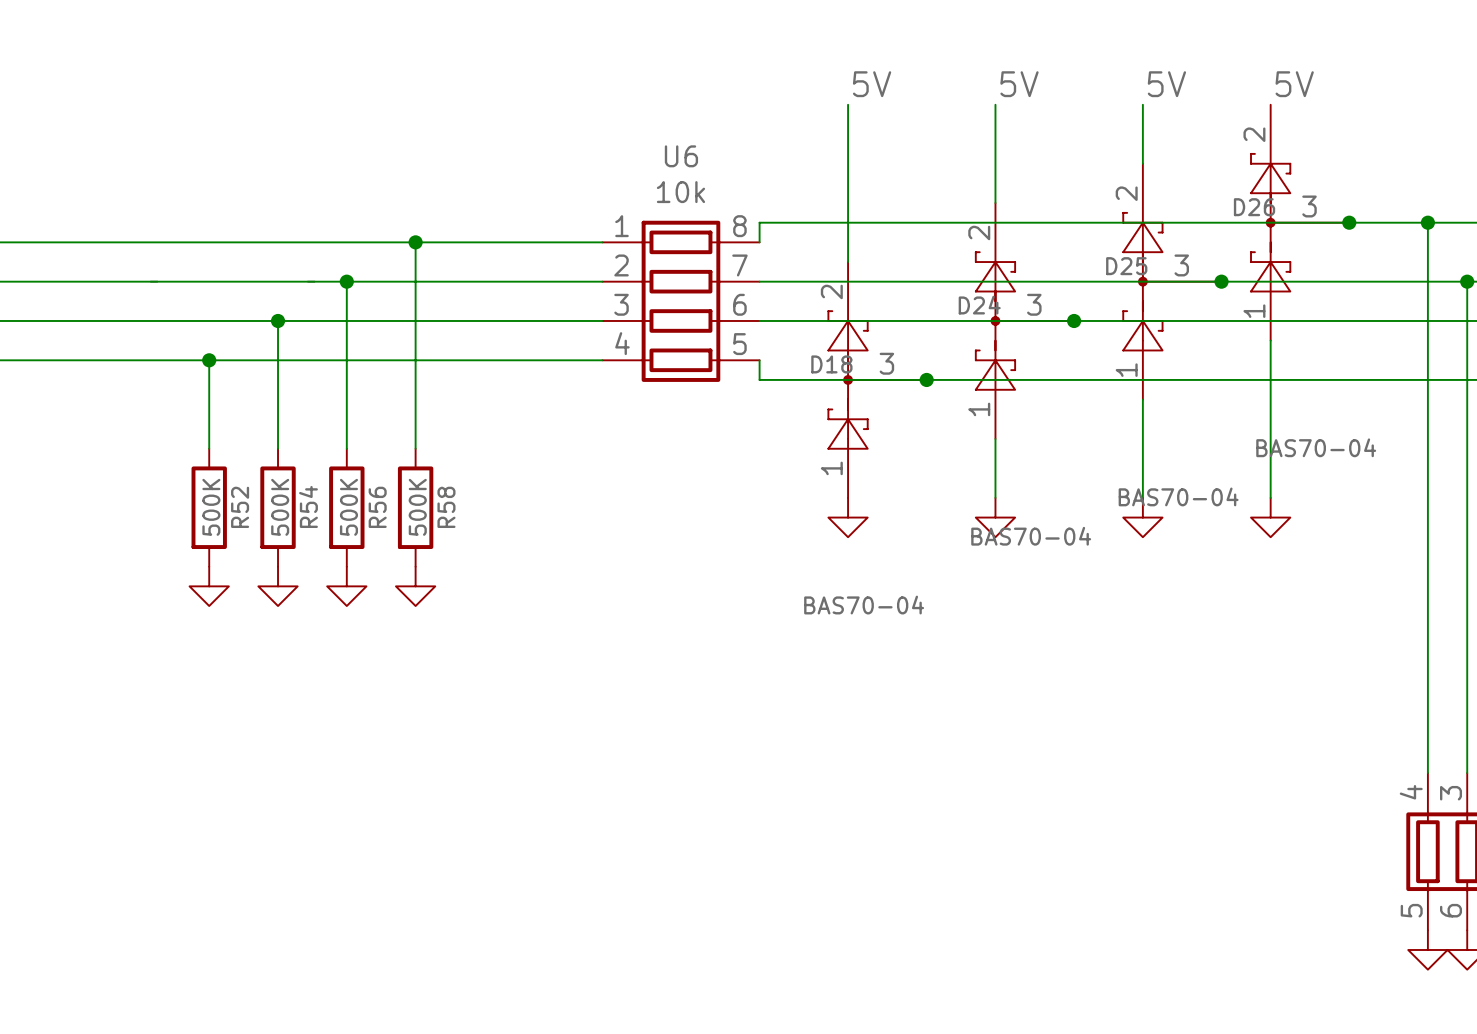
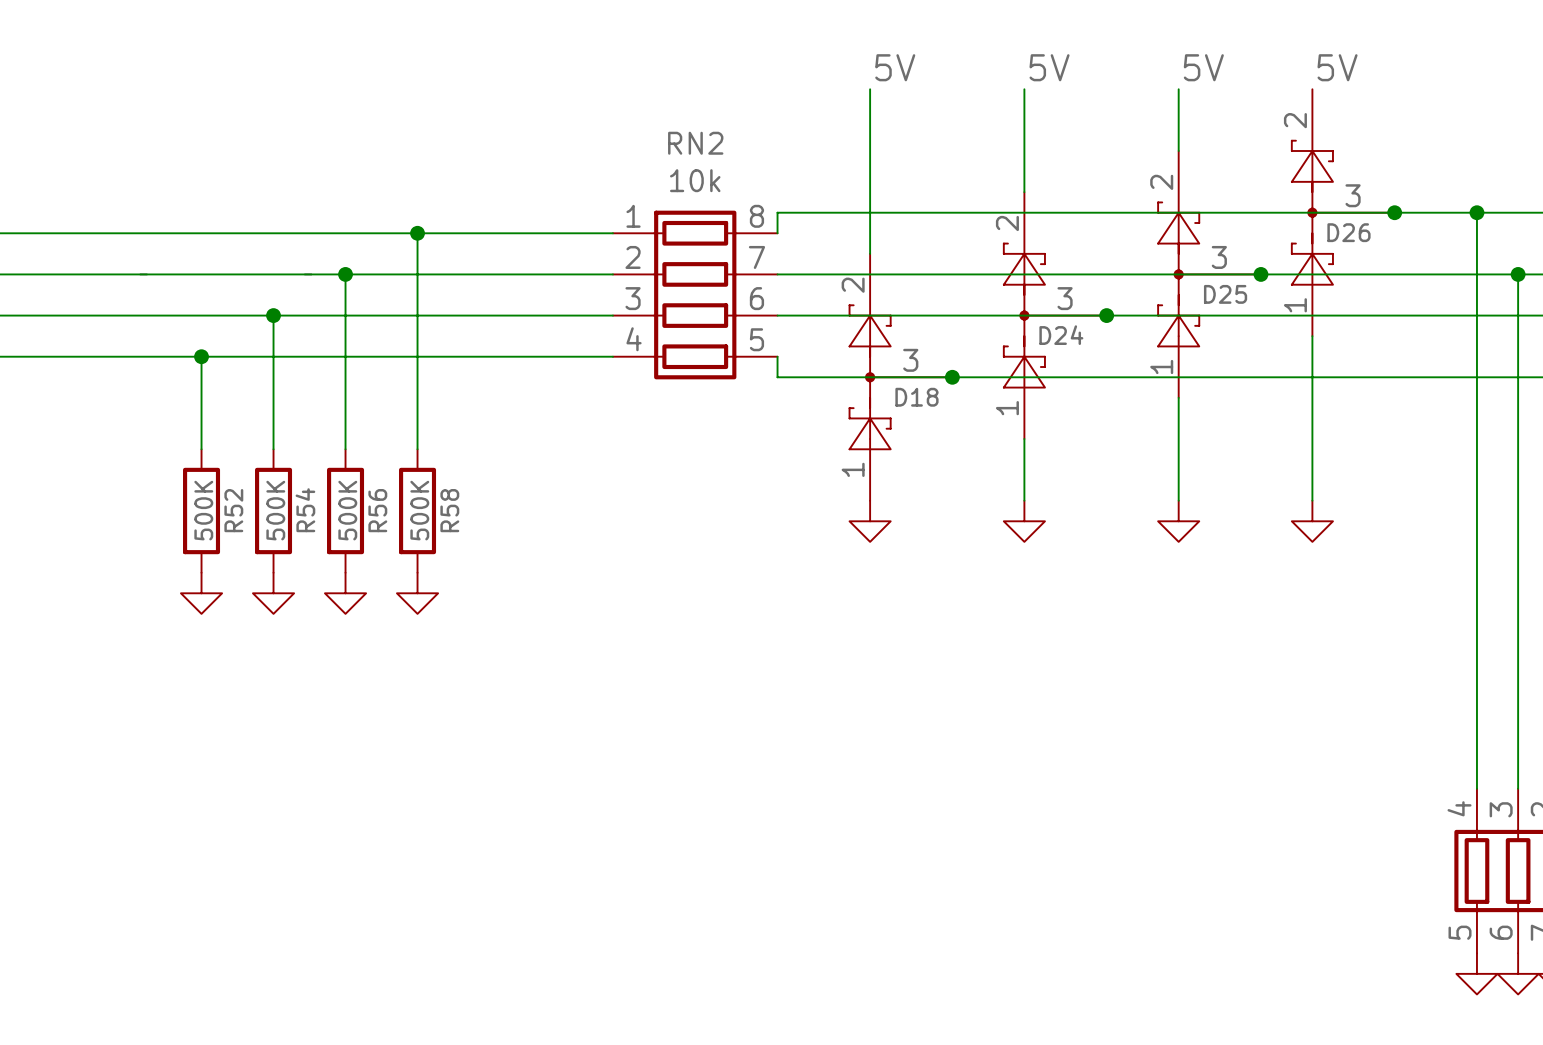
U6 name: U6 (681, 156) -> RN2 (695, 143)
D26 name position: D26 (1254, 207) -> D26 (1348, 232)
D25 name position: D25 (1126, 266) -> D25 (1225, 294)
D24 name position: D24 (979, 305) -> D24 (1061, 335)
D18 name position: D18 (831, 364) -> D18 (916, 397)
D26 value: BAS70-04 (1316, 447) -> none
D25 value: BAS70-04 (1178, 496) -> none
D24 value: BAS70-04 (1031, 536) -> none
D18 value: BAS70-04 (864, 605) -> none

